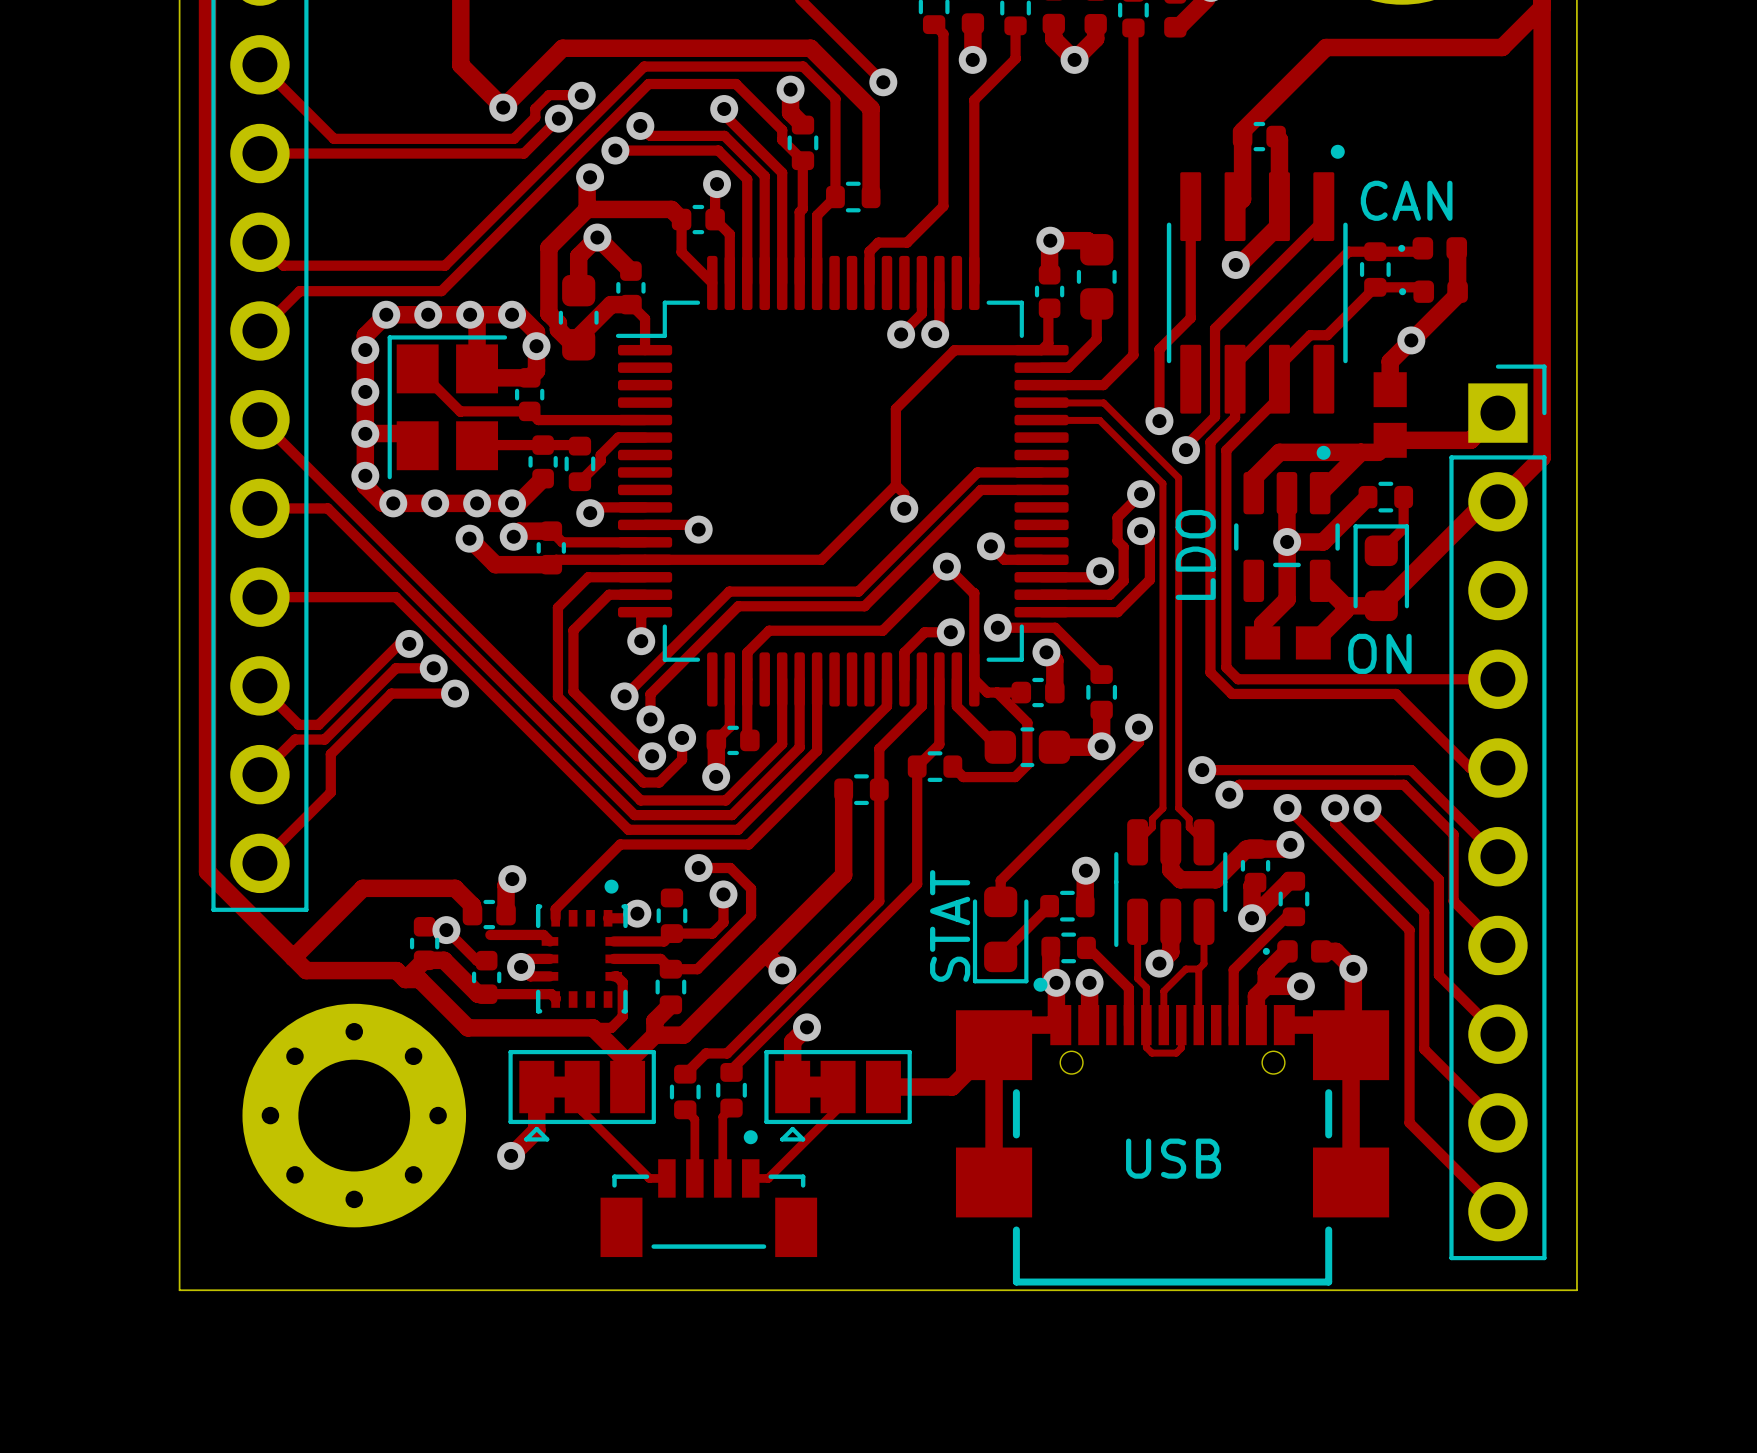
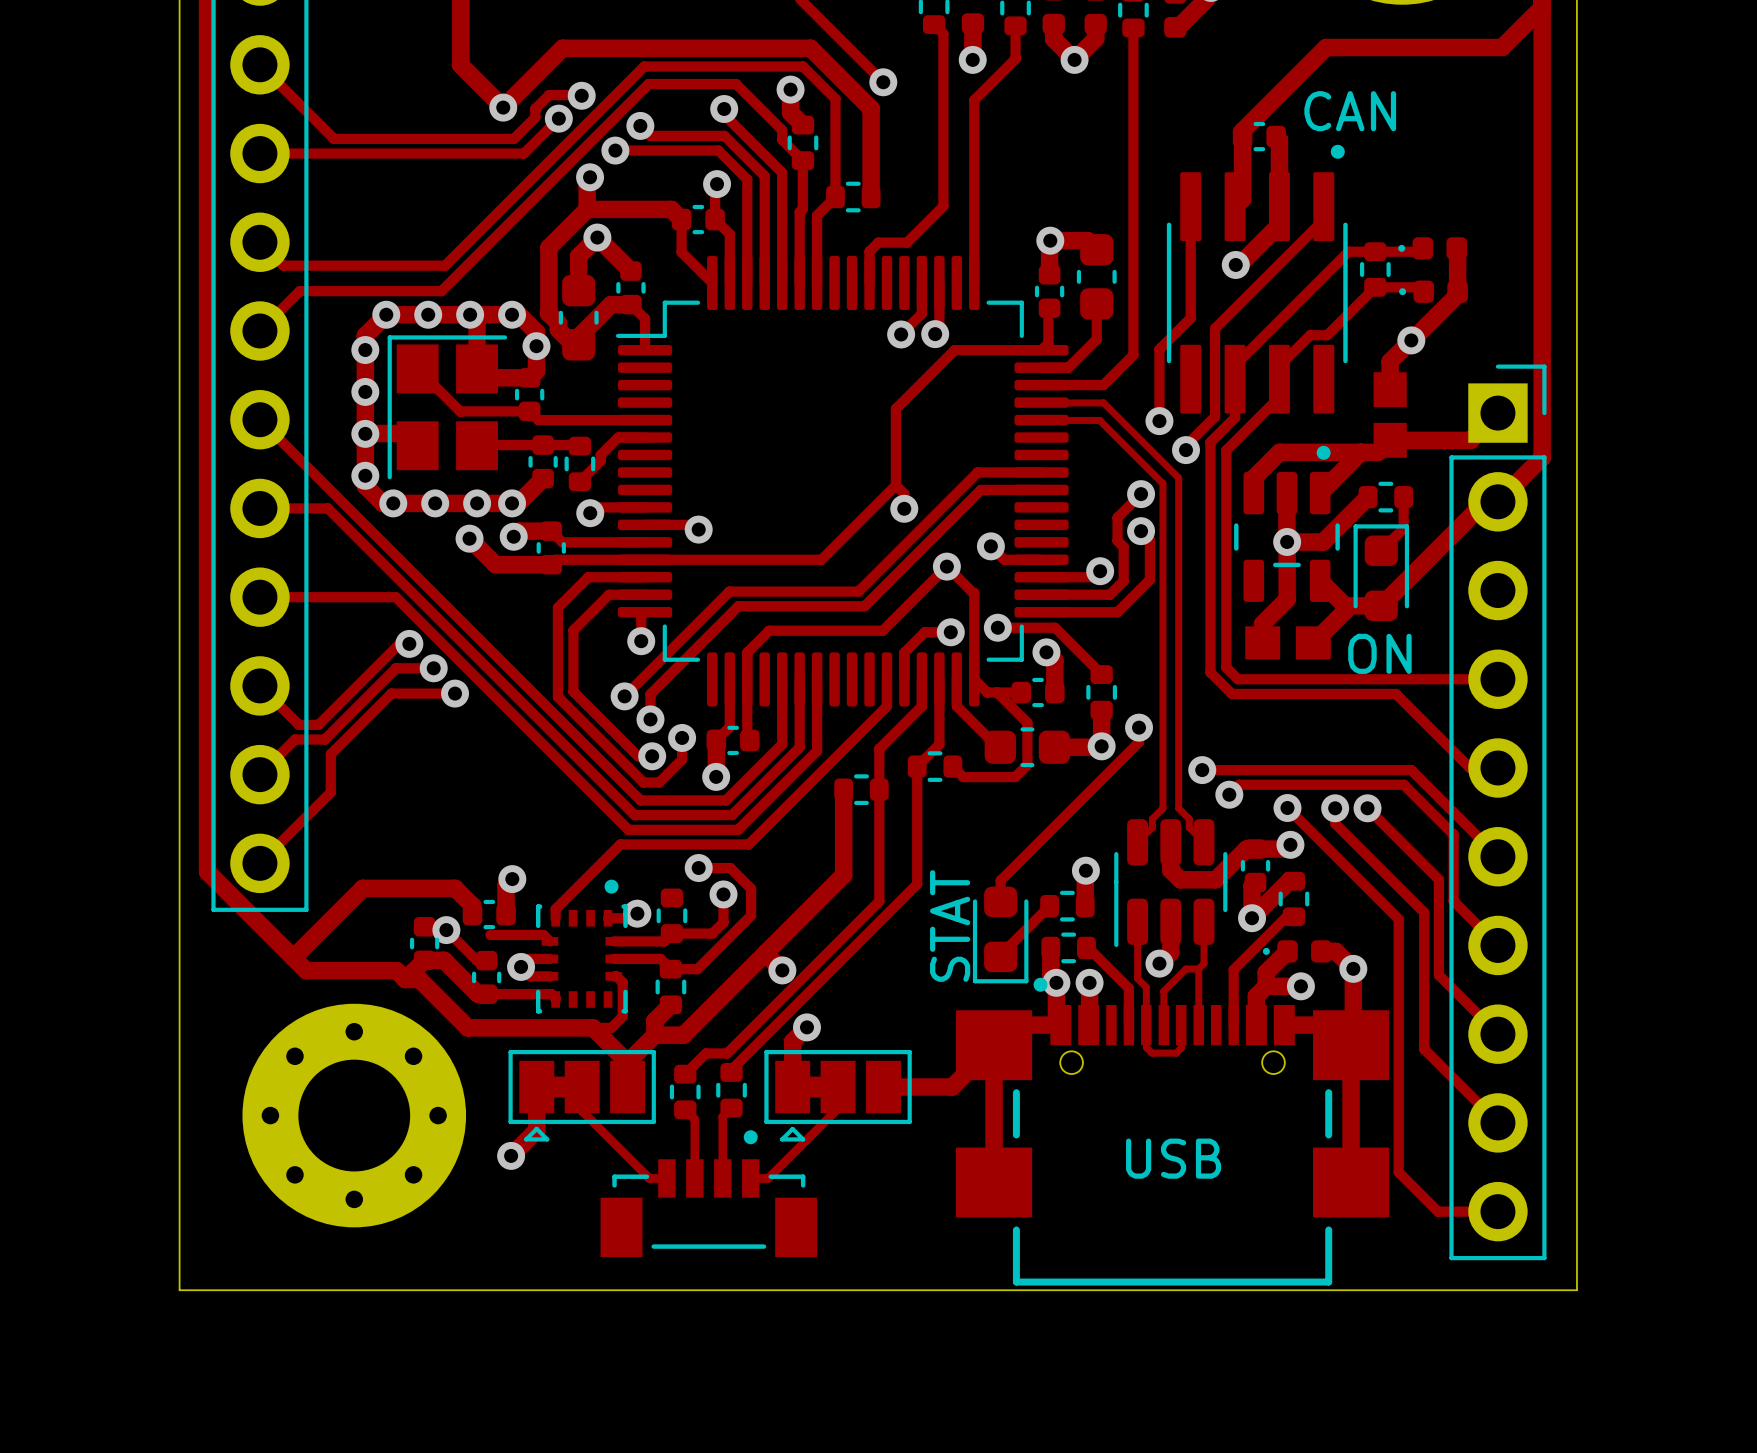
text position: CAN (1406, 200) -> CAN (1350, 111)
text: LDO (1195, 554) -> none
track: (1398, 919) (1409, 930) (1409, 1122) (1497, 1211) -> (1398, 919) (1398, 1172) (1438, 1211) (1497, 1211)

